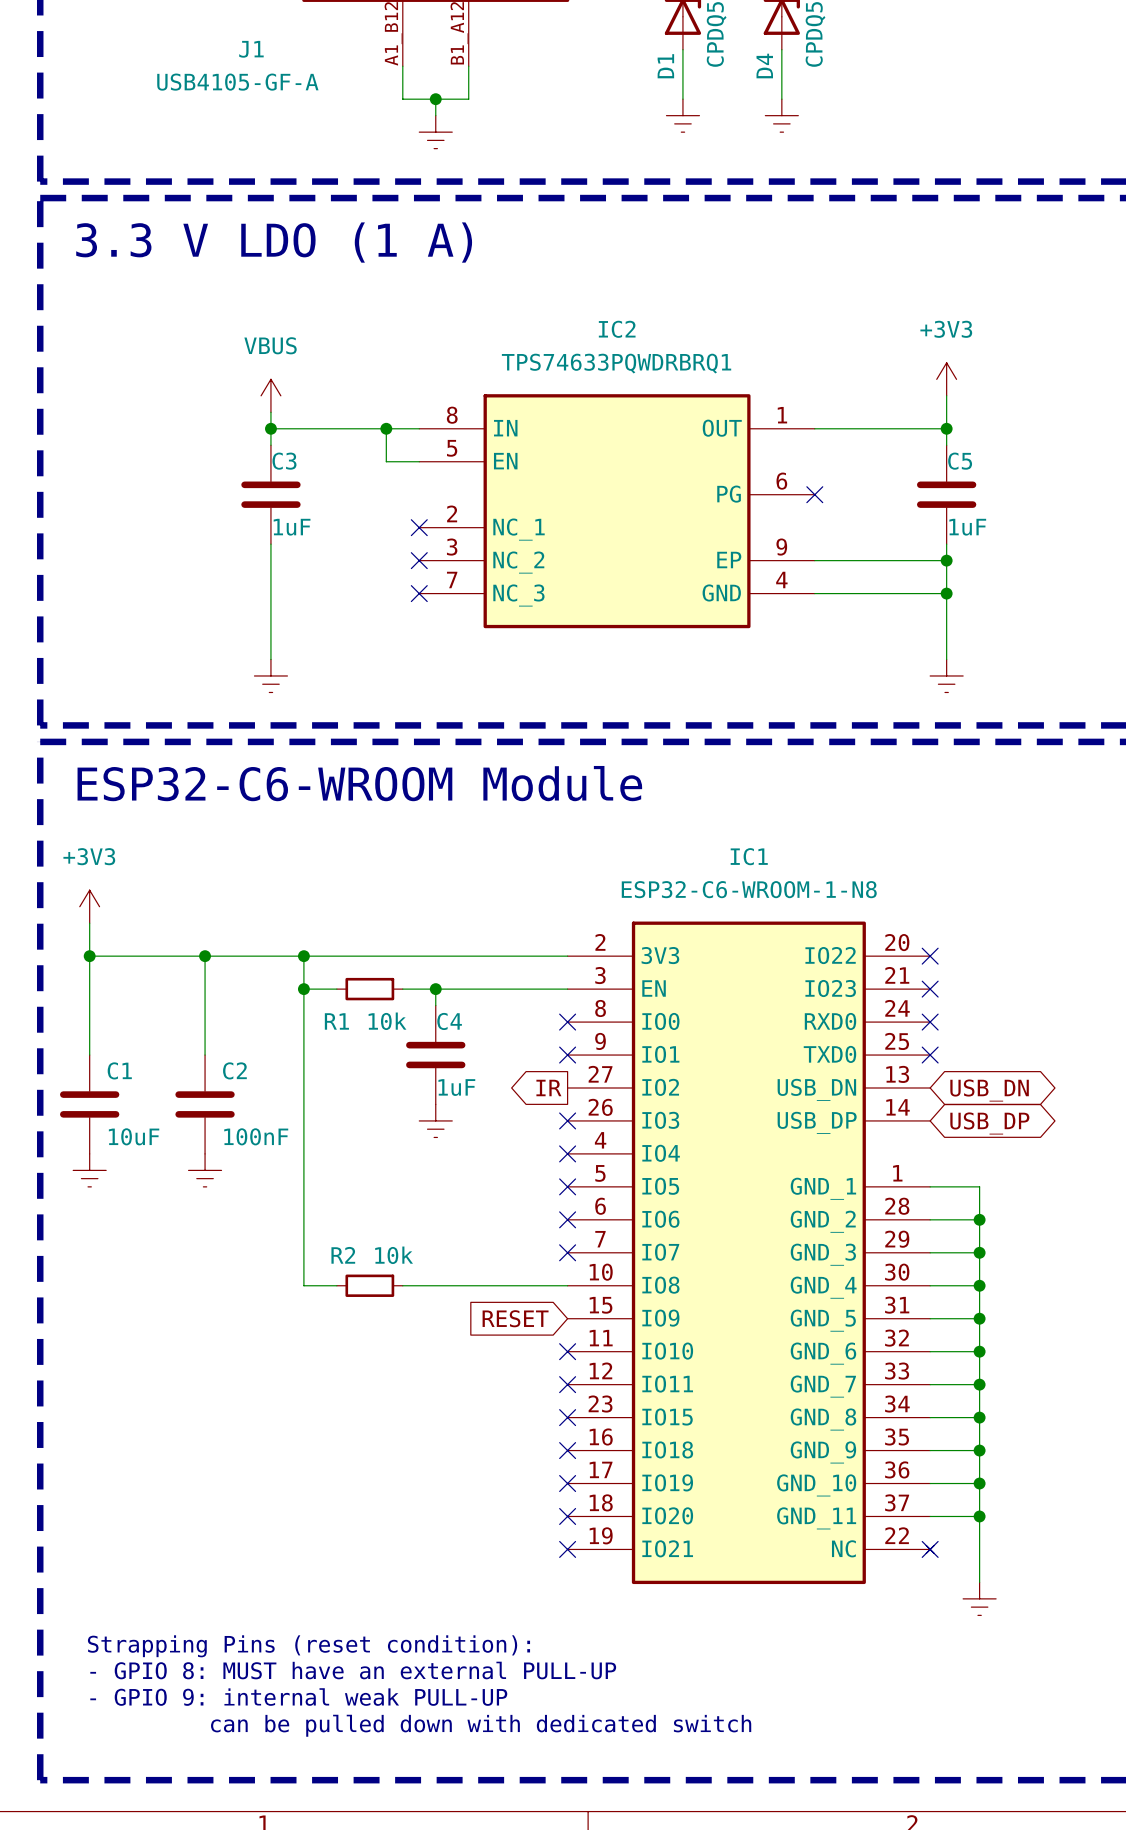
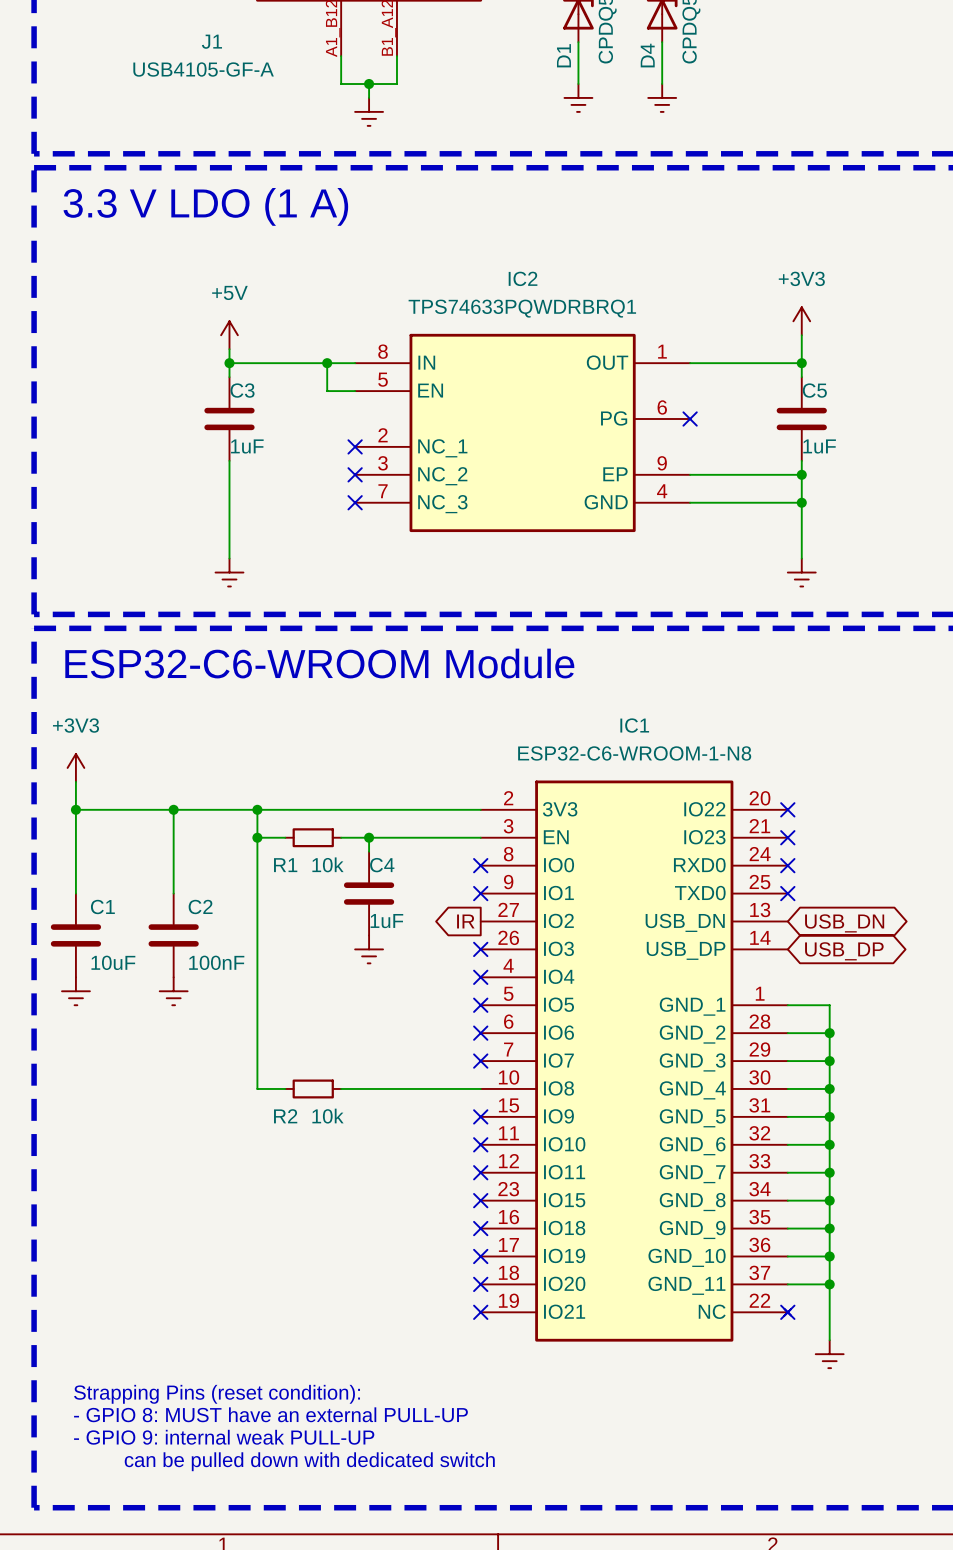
power symbol: VBUS (270, 395) -> +5V (229, 335)
R2 name position: R2 (343, 1255) -> R2 (285, 1116)
R2 value position: 10k (394, 1255) -> 10k (327, 1116)
global label: RESET (515, 1318) -> none
no-connect mark: none -> (480, 1116)

